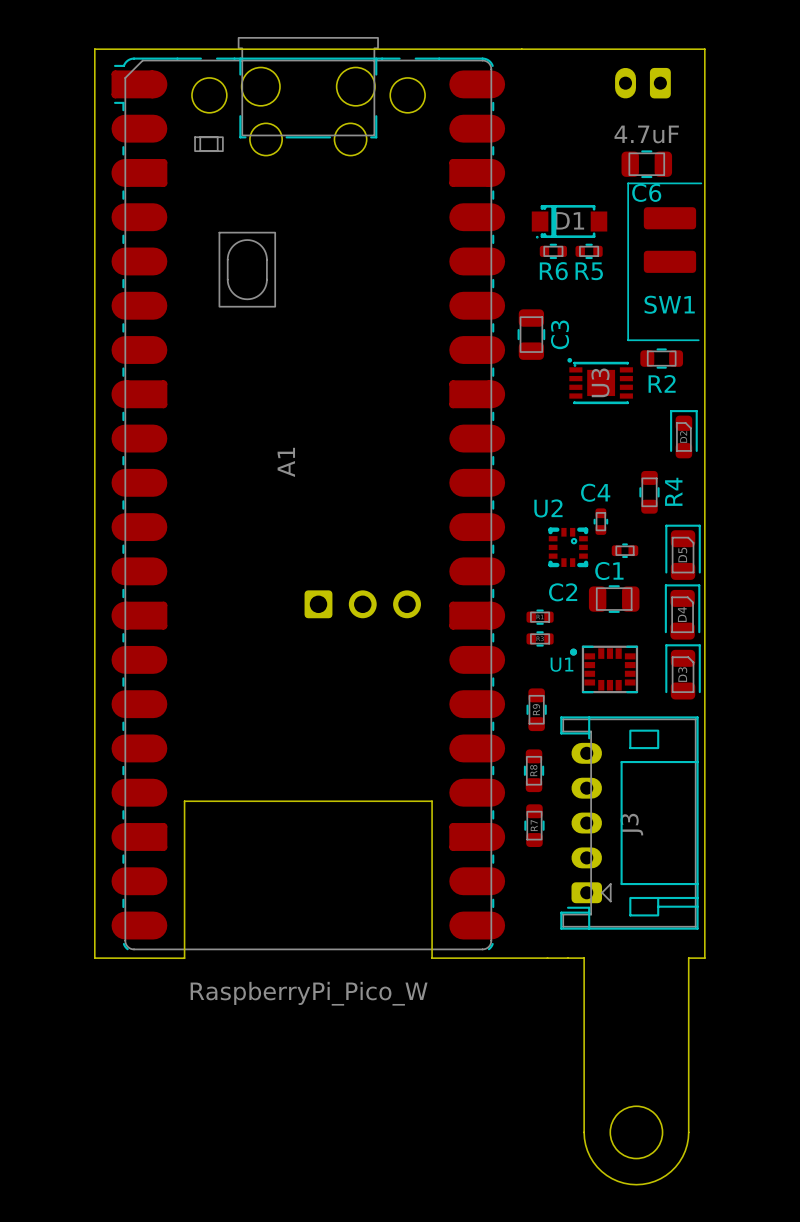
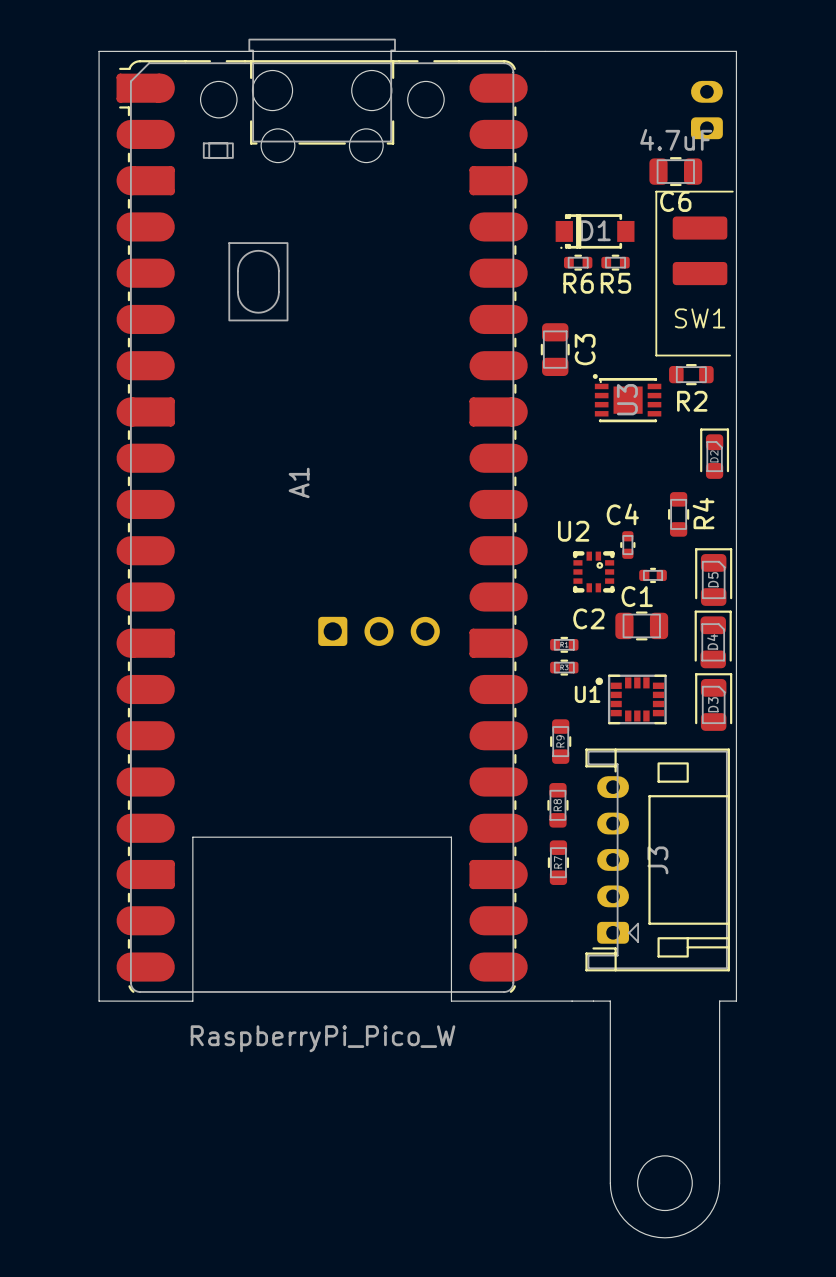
part rotation: 0° (642, 83) -> 90° clockwise (706, 110)
part position: (642, 83) -> (706, 110)

